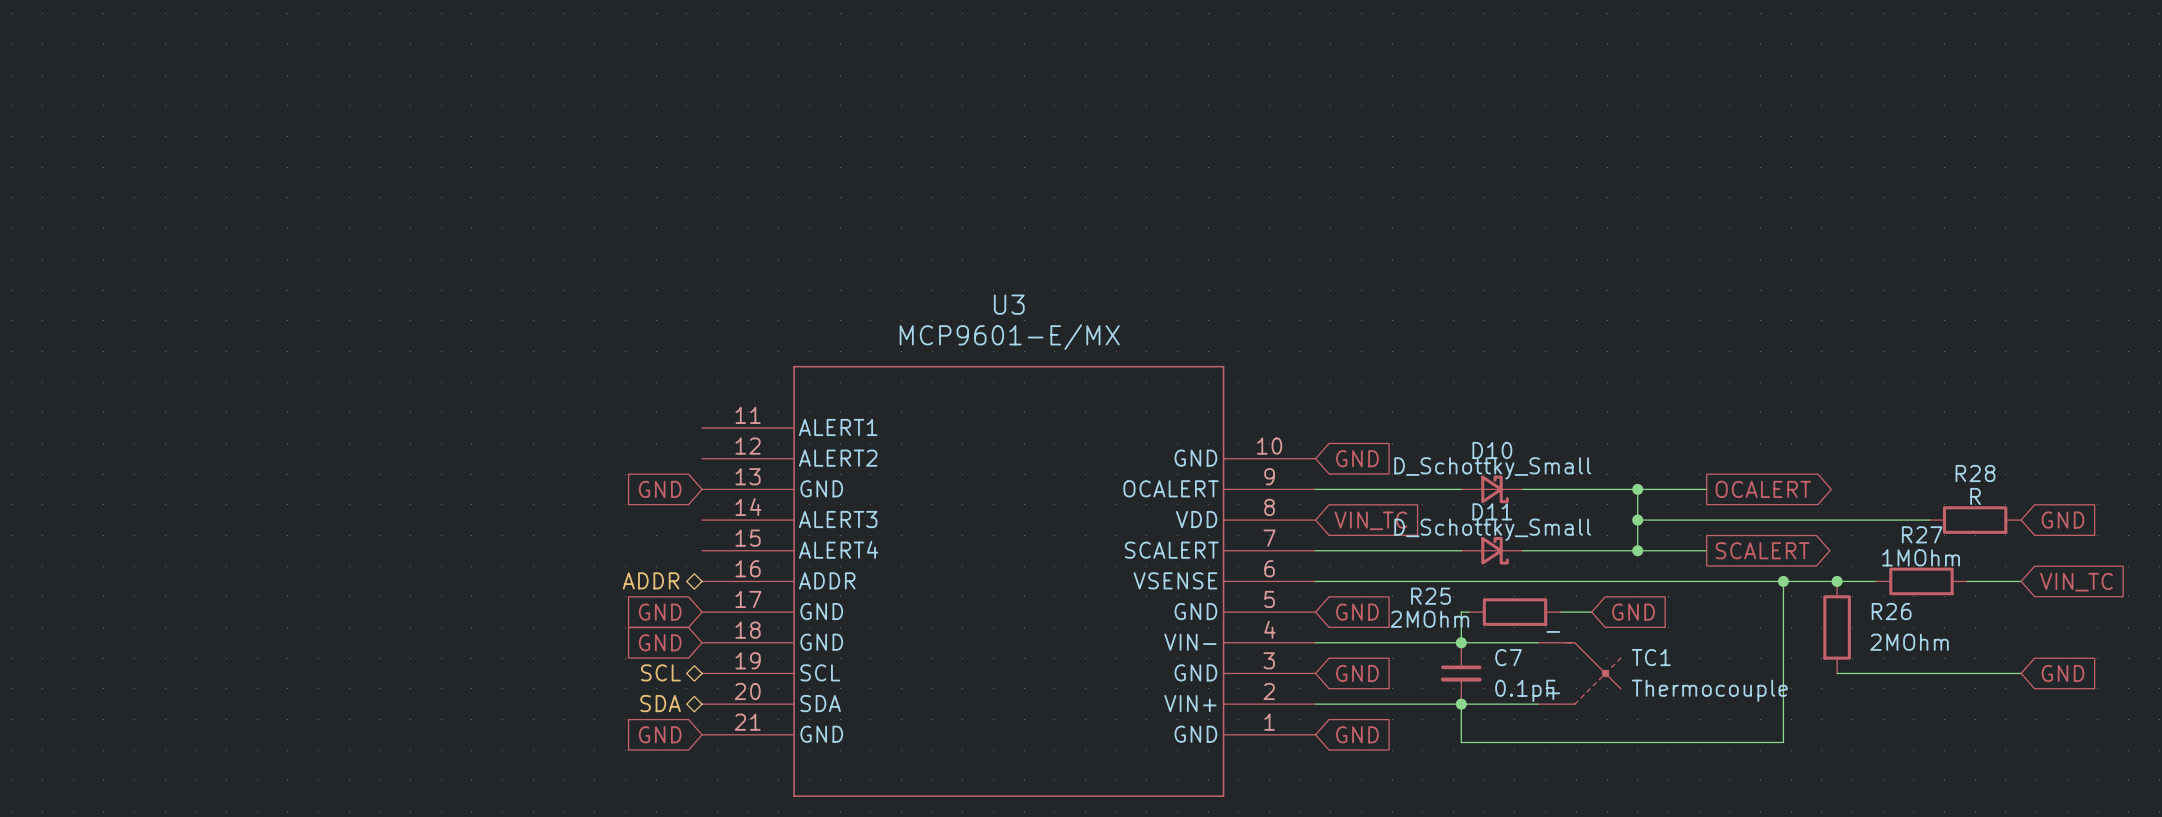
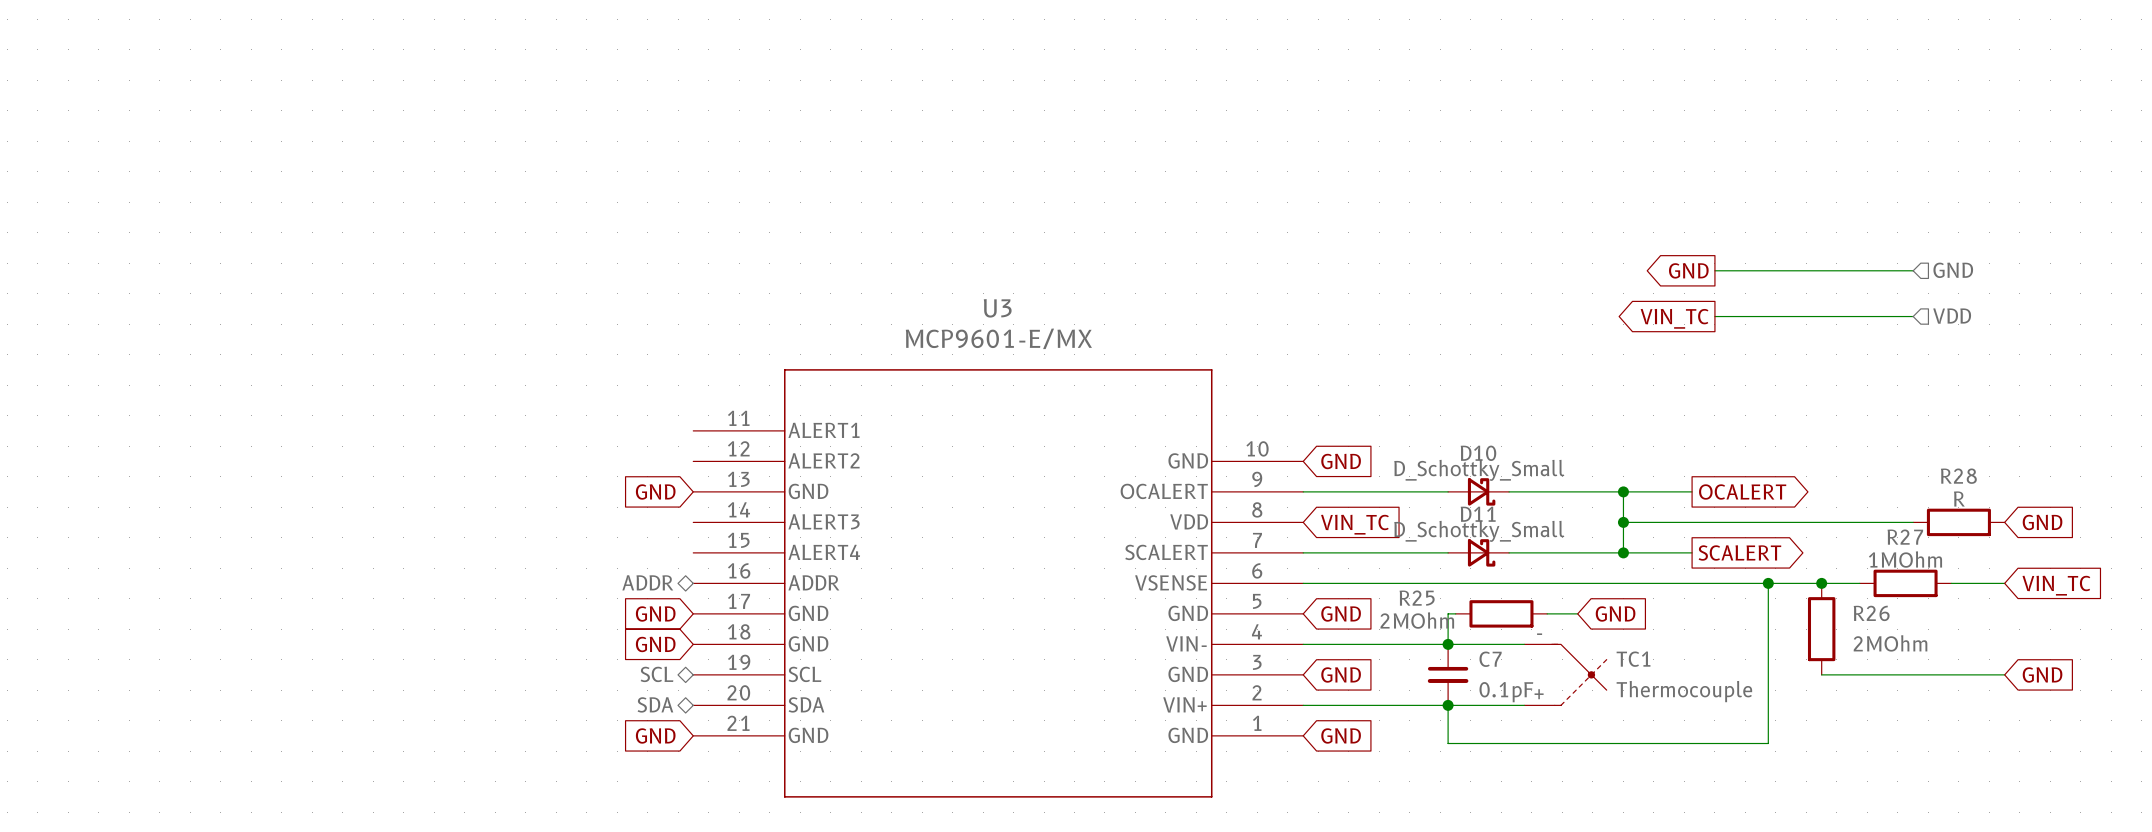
global label: none -> GND (1688, 270)
wire: none -> (1714, 270) (1913, 270)
hierarchical label: none -> GND (1953, 270)
hierarchical label: none -> VDD (1952, 316)
global label: none -> VIN_TC (1674, 318)
wire: none -> (1714, 316) (1913, 316)

